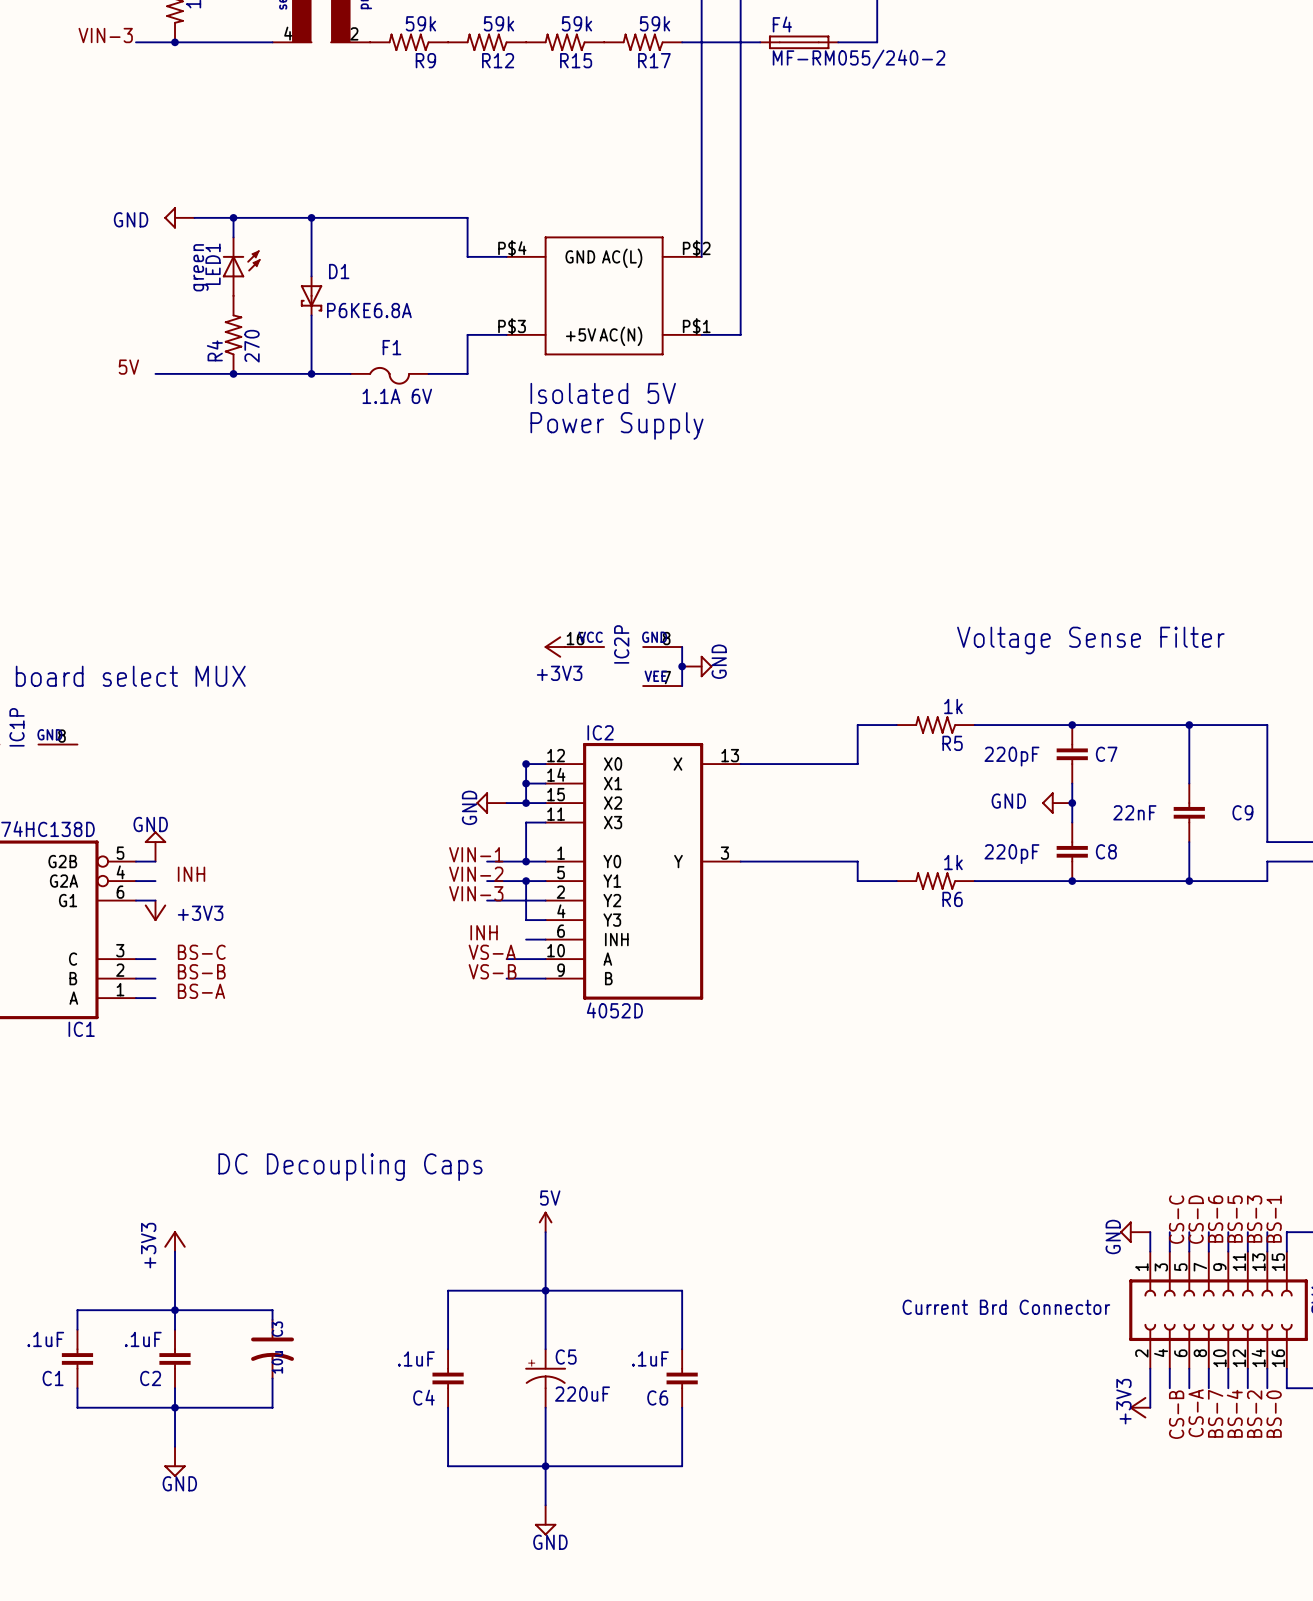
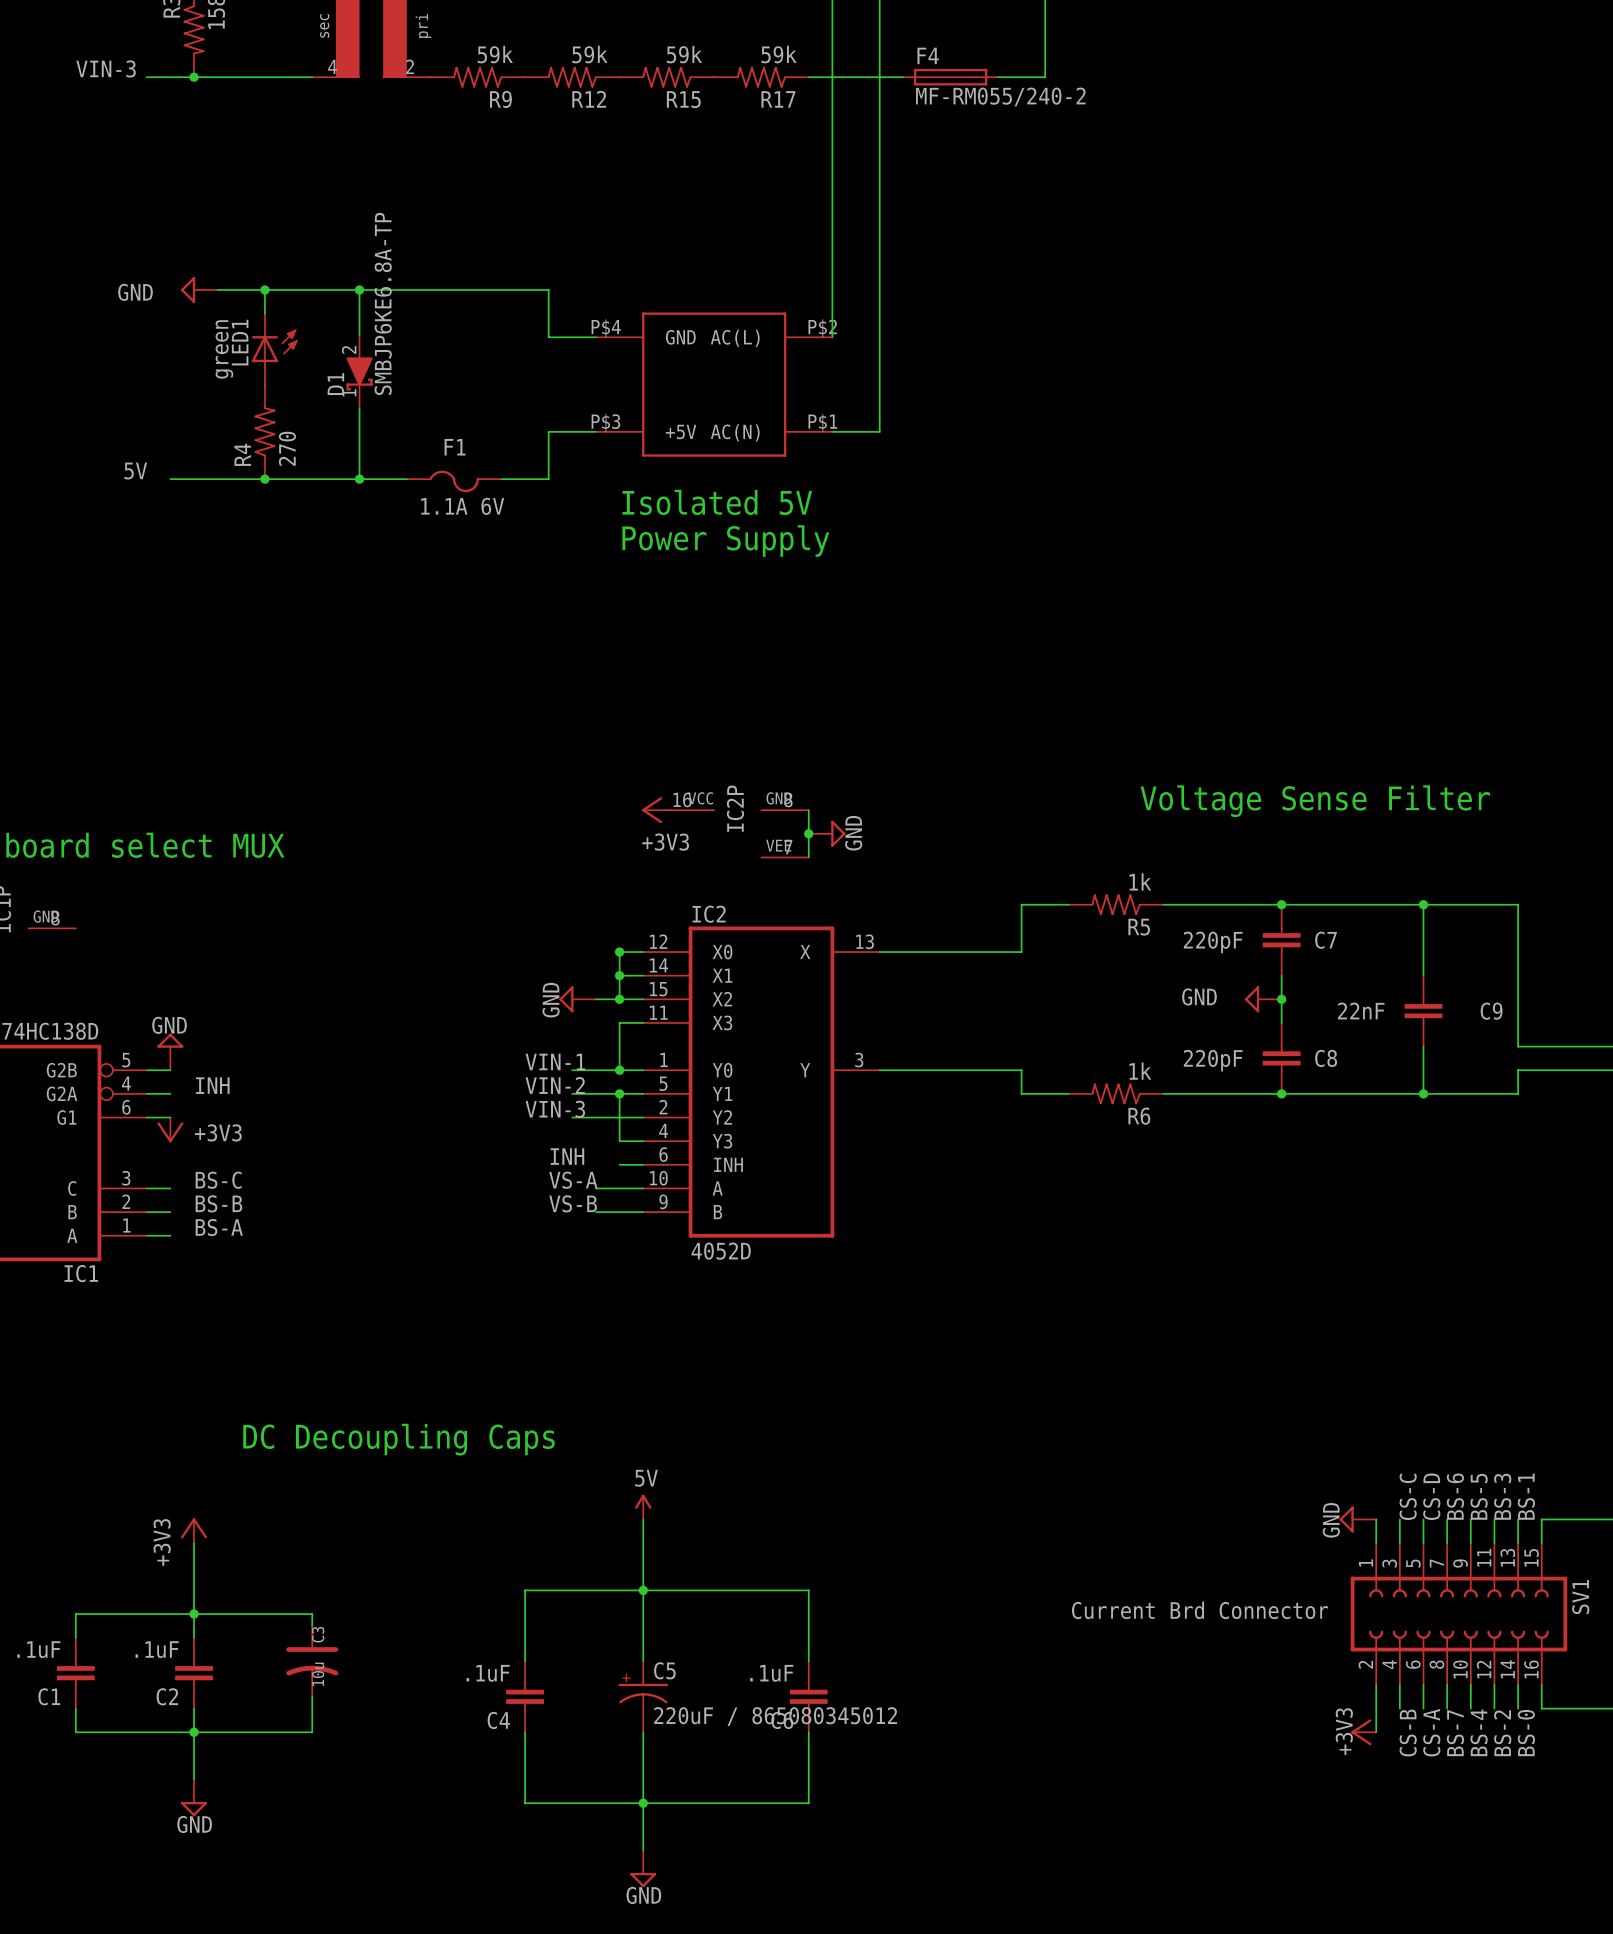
D1 name position: D1 (339, 271) -> D1 (335, 384)
D1 symbol: [300, 276, 323, 316] -> [346, 334, 373, 409]
D1 value: P6KE6.8A (369, 310) -> SMBJP6KE6.8A-TP (383, 303)
C5 value: 220uF (582, 1394) -> 220uF / 865080345012 (775, 1716)

